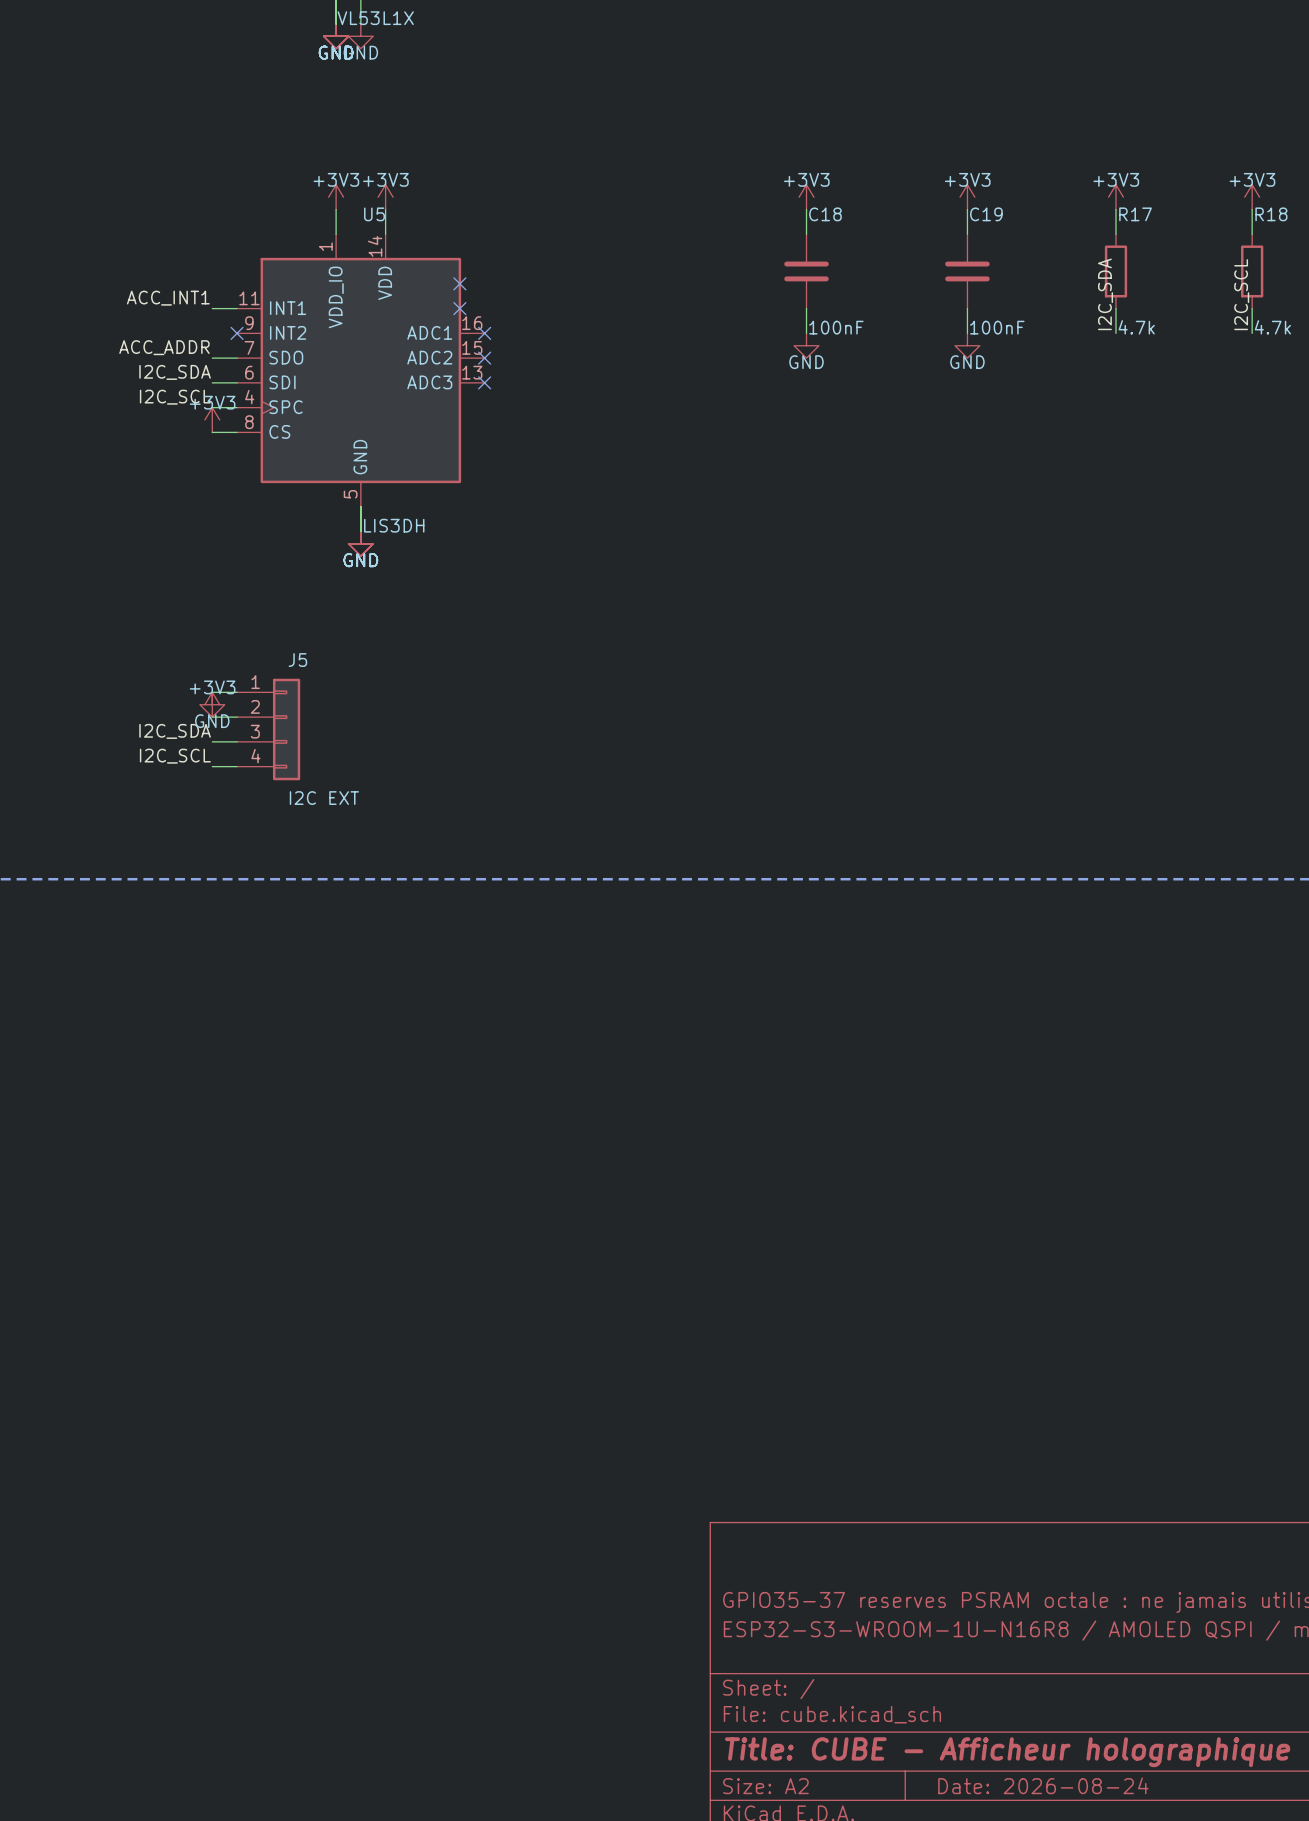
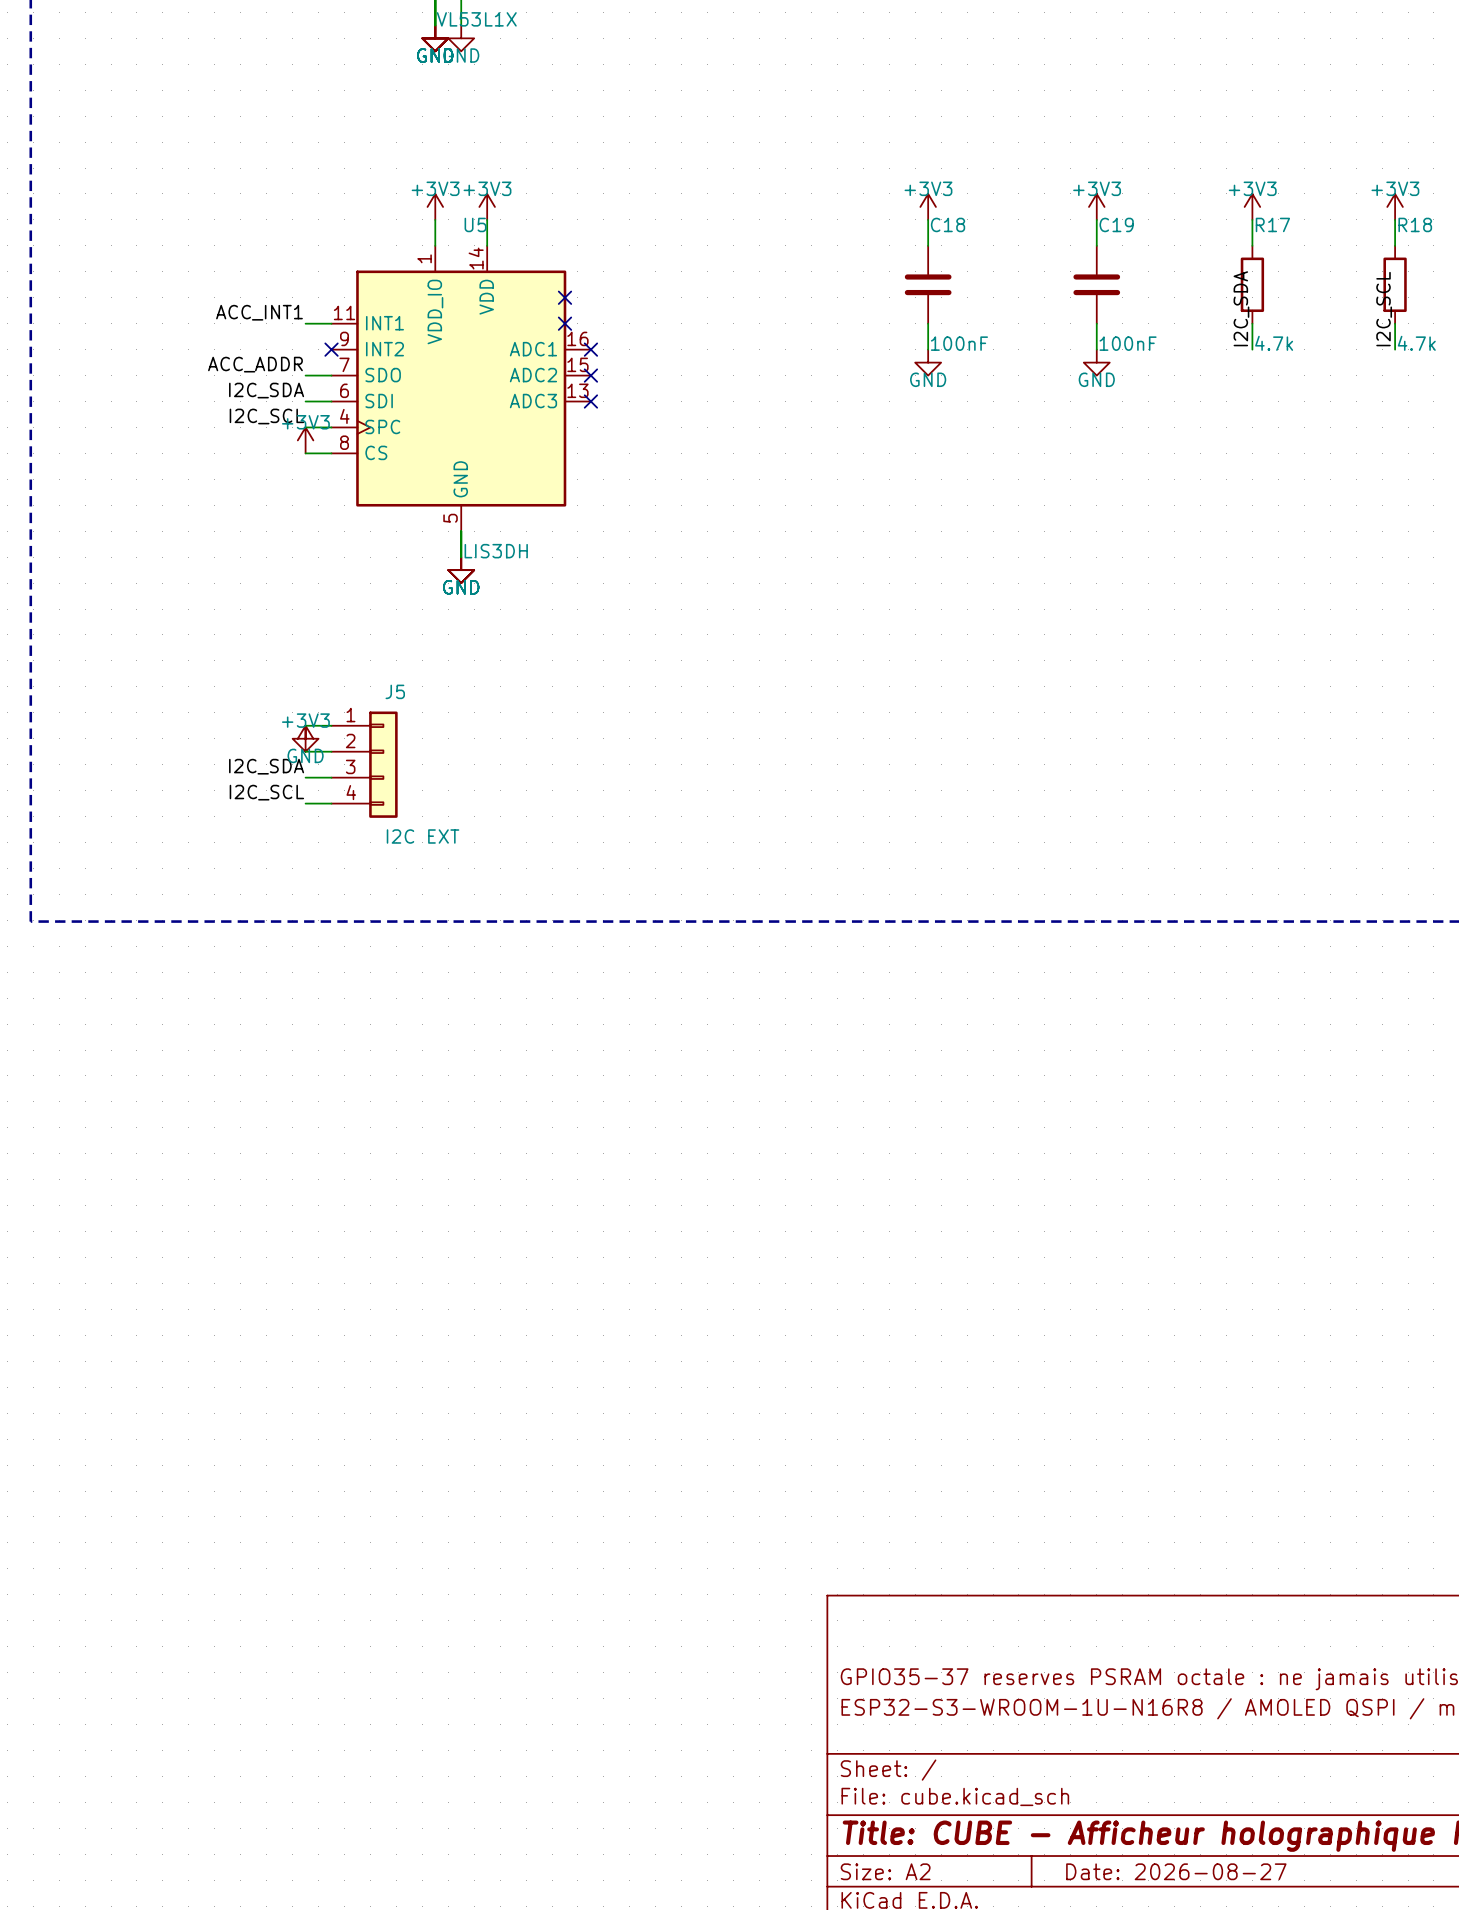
title block: Date: 2026-08-24 (1043, 1785) -> Date: 2026-08-27 (1176, 1871)

